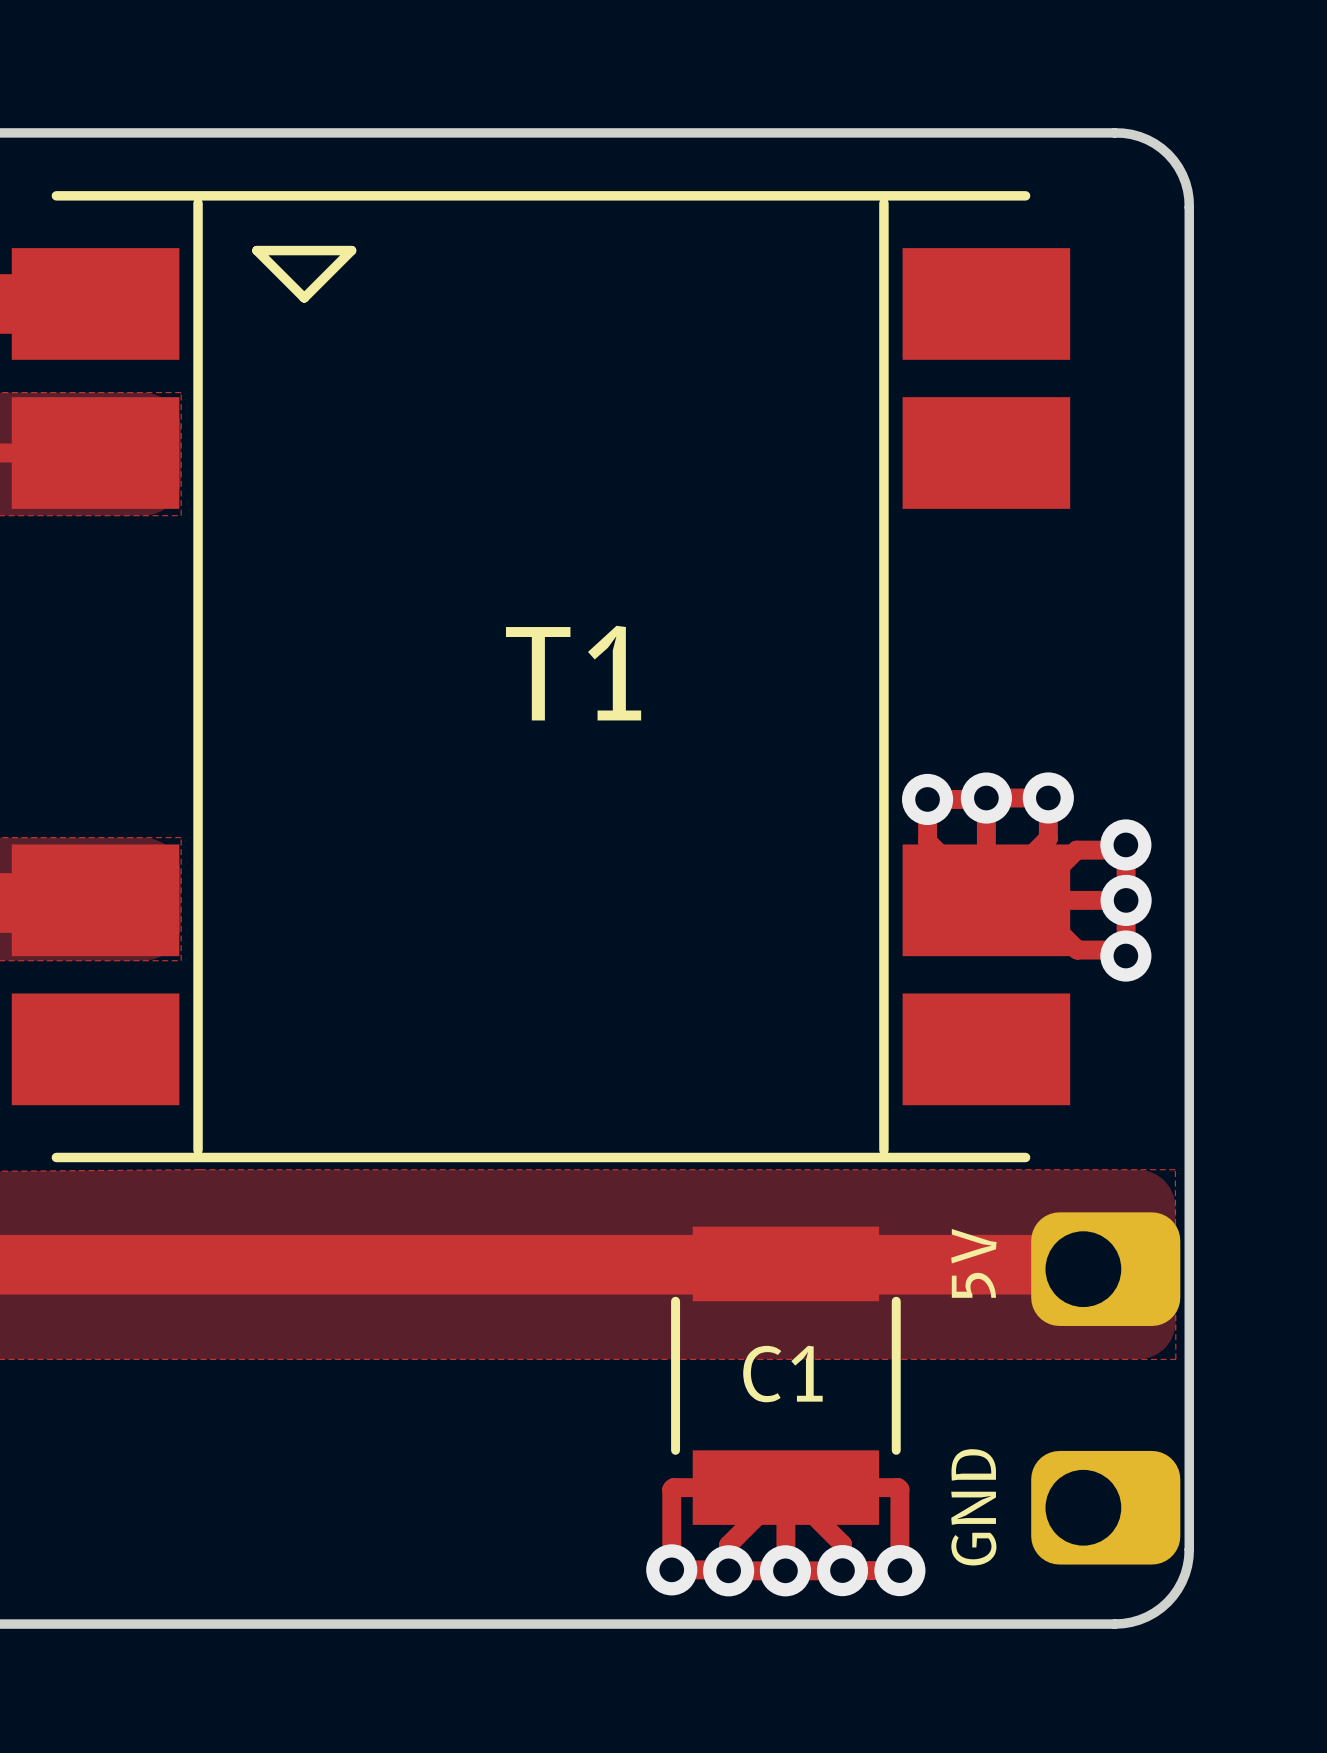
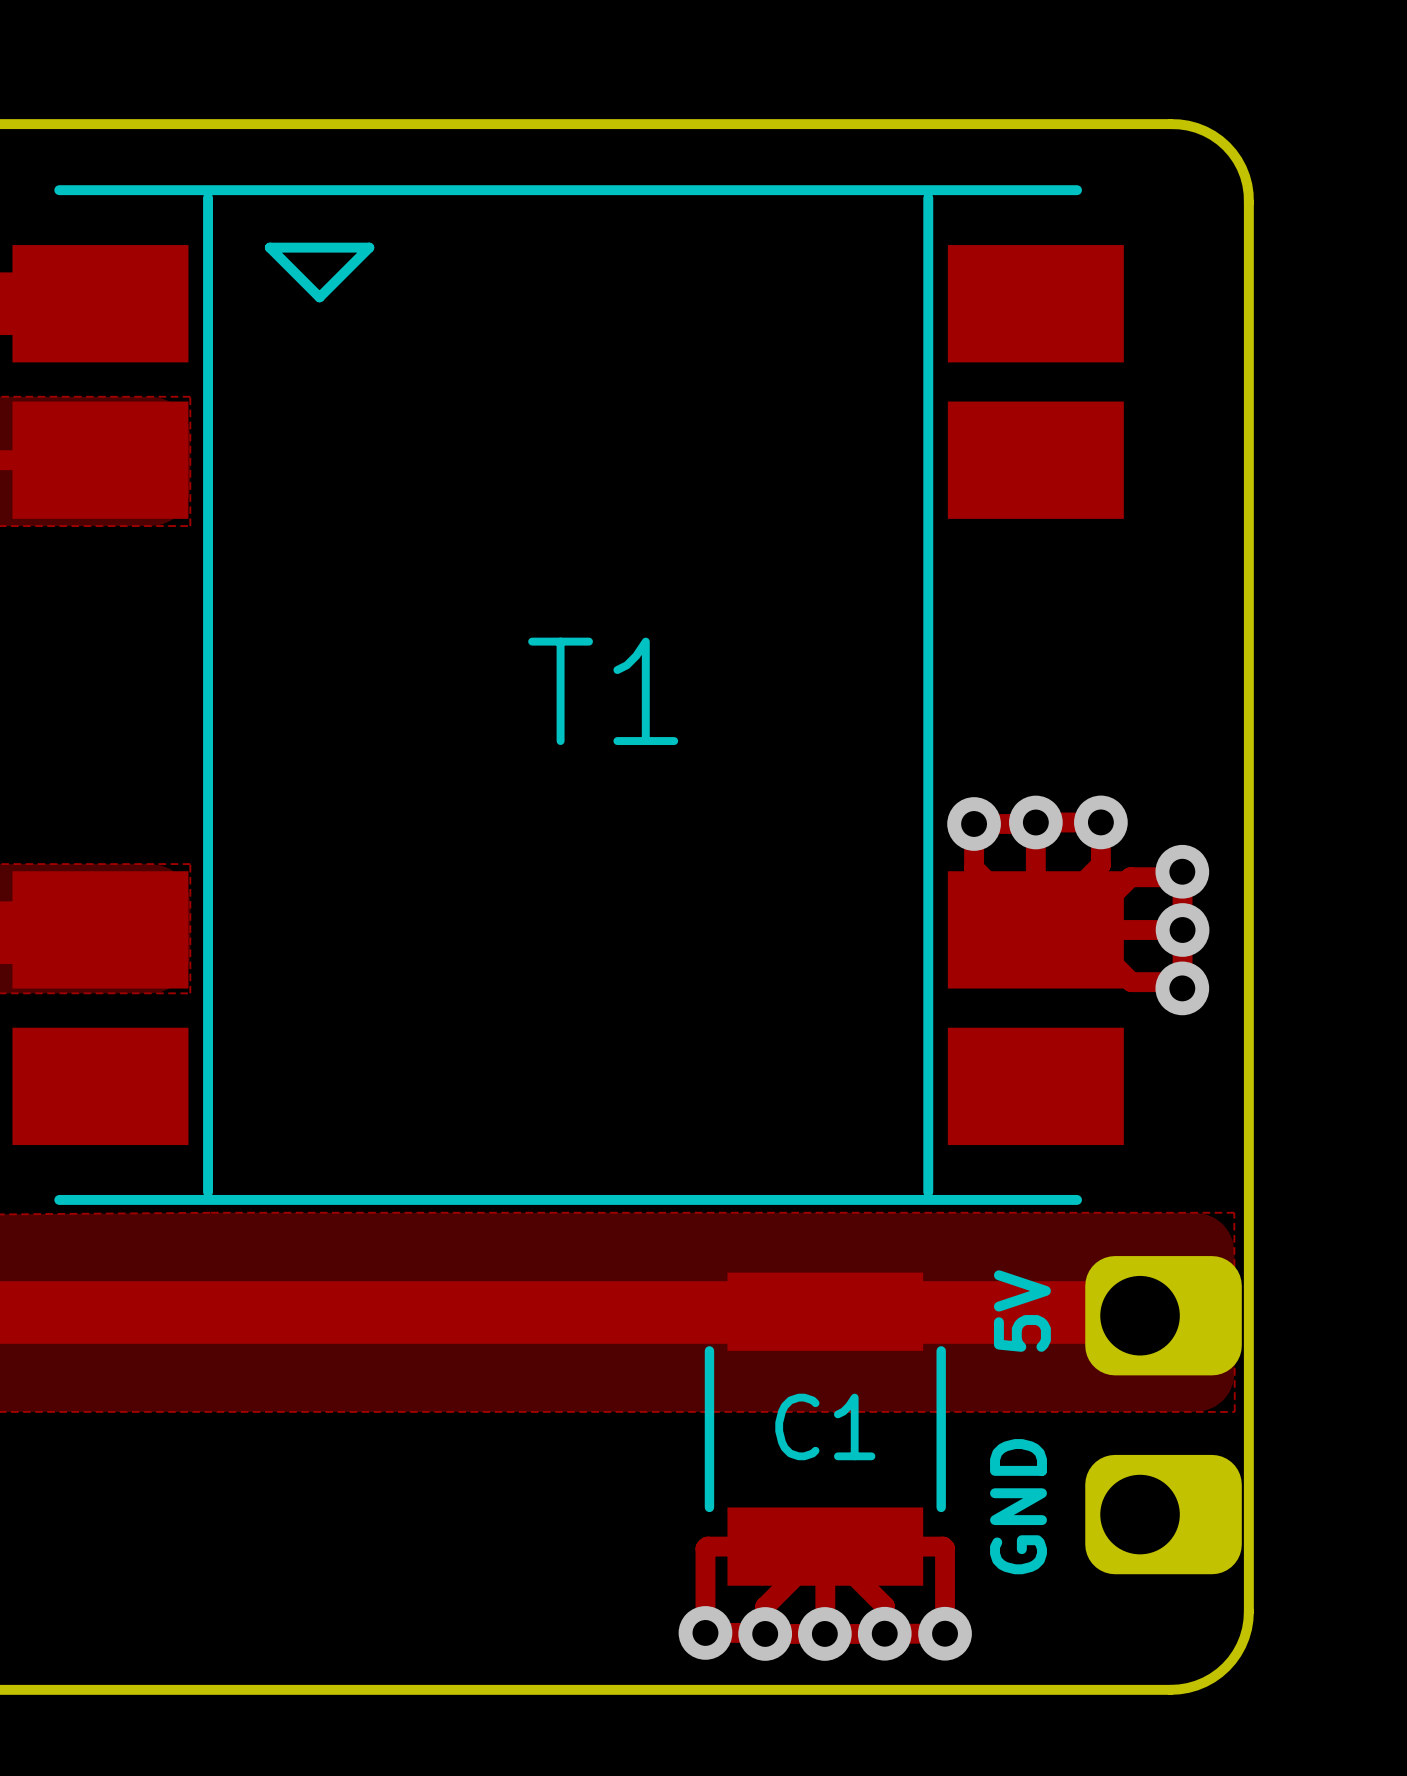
part footprint: [1031, 1212, 1181, 1565] -> [1085, 1256, 1242, 1575]
text position: GND (973, 1507) -> GND (1018, 1506)

